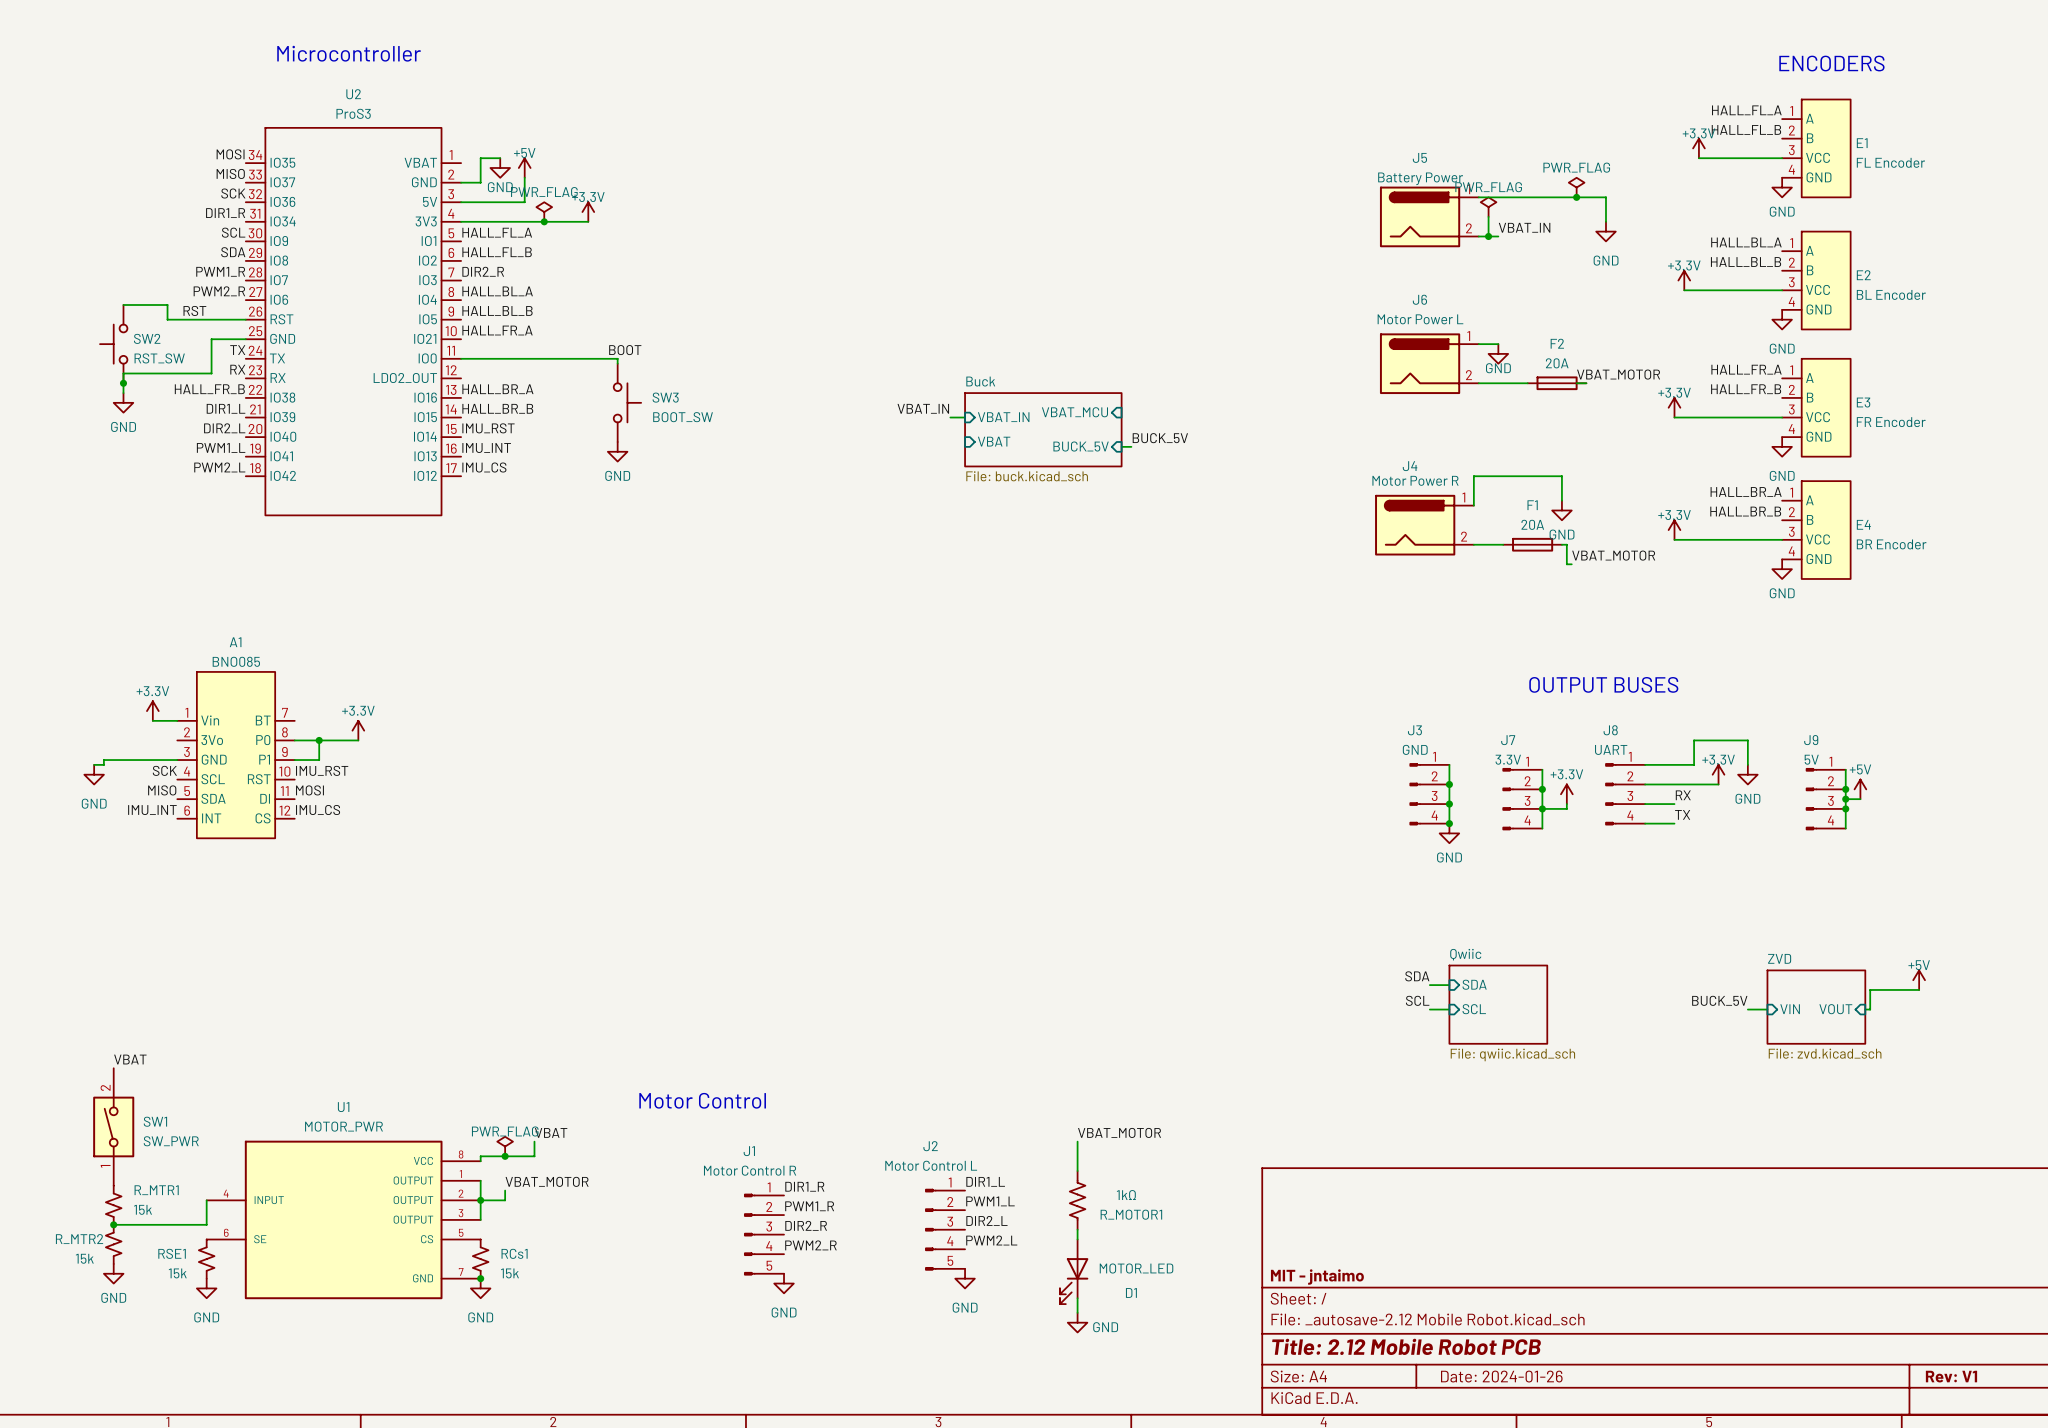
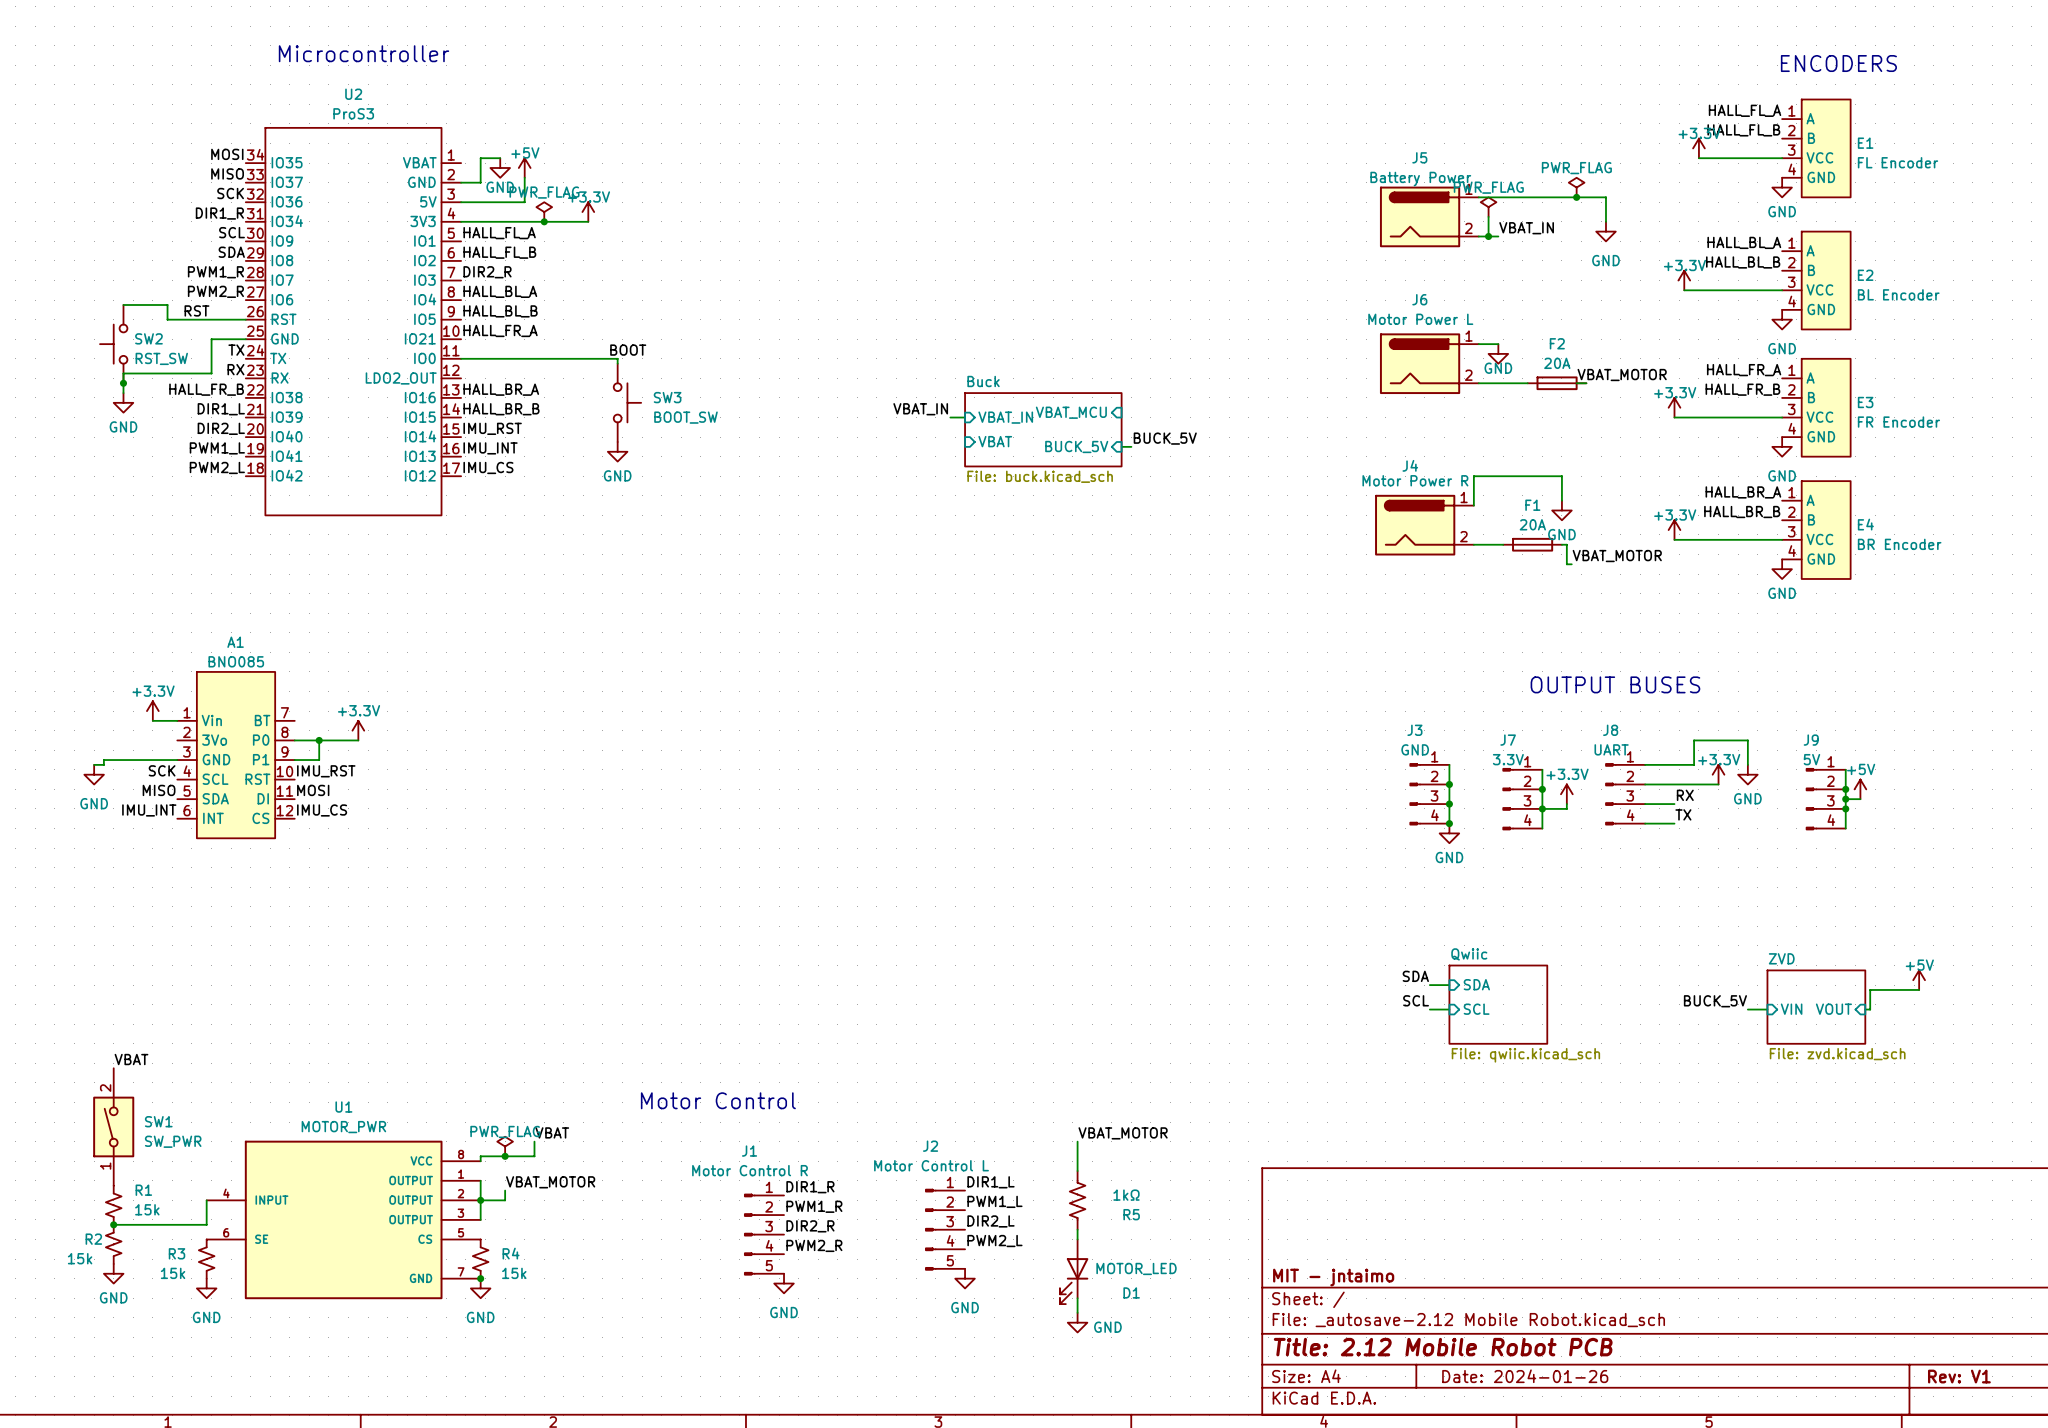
R_MTR1 name: R_MTR1 (156, 1190) -> R1 (143, 1190)
R_MOTOR1 name: R_MOTOR1 (1131, 1214) -> R5 (1131, 1214)
R_MTR2 name: R_MTR2 (79, 1239) -> R2 (93, 1239)
RSE1 name: RSE1 (172, 1253) -> R3 (177, 1253)
RCs1 name: RCs1 (514, 1253) -> R4 (511, 1253)

